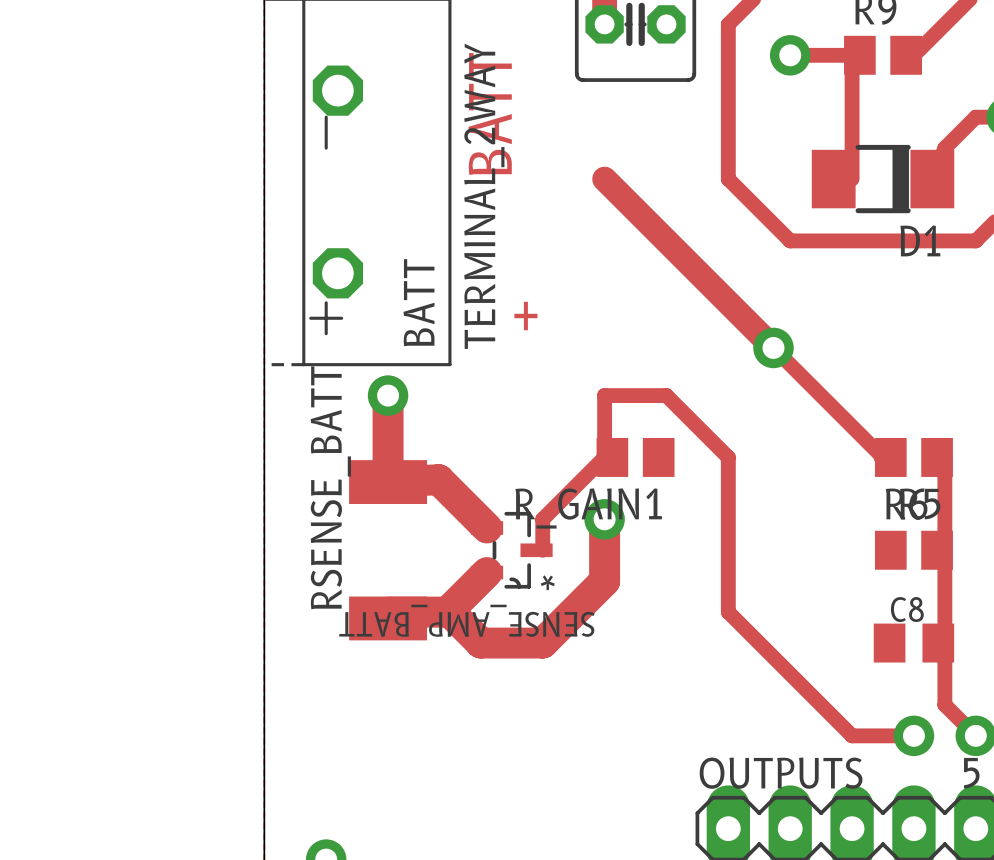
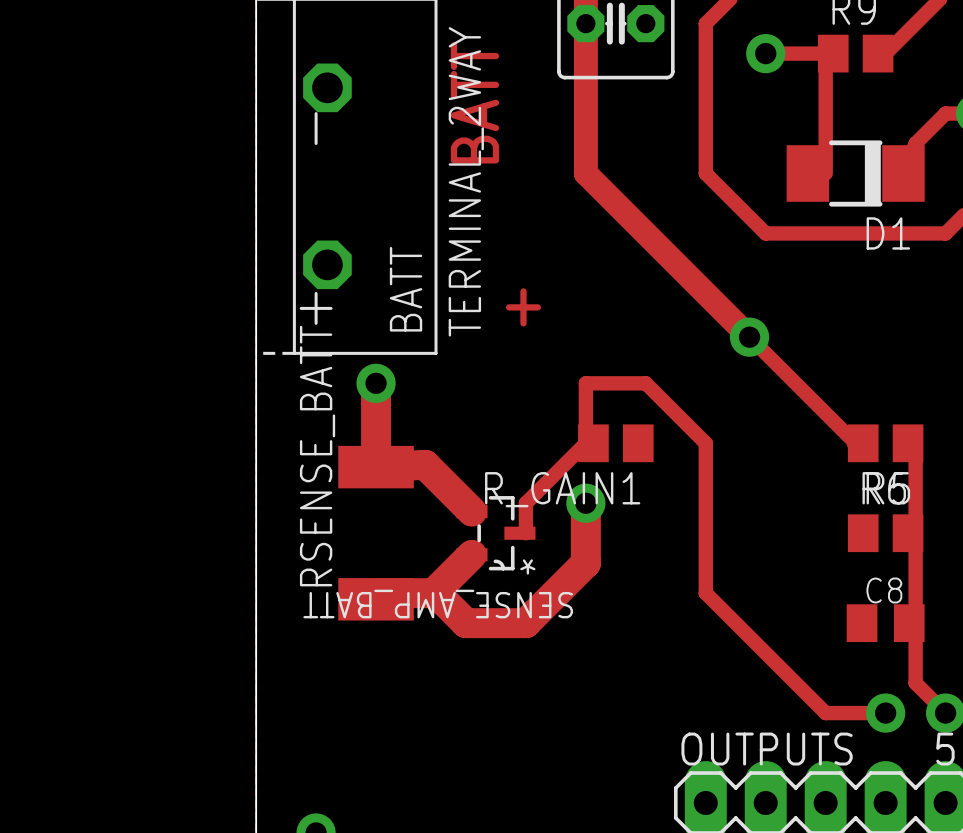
track: none -> (585, 23) (585, 173)

